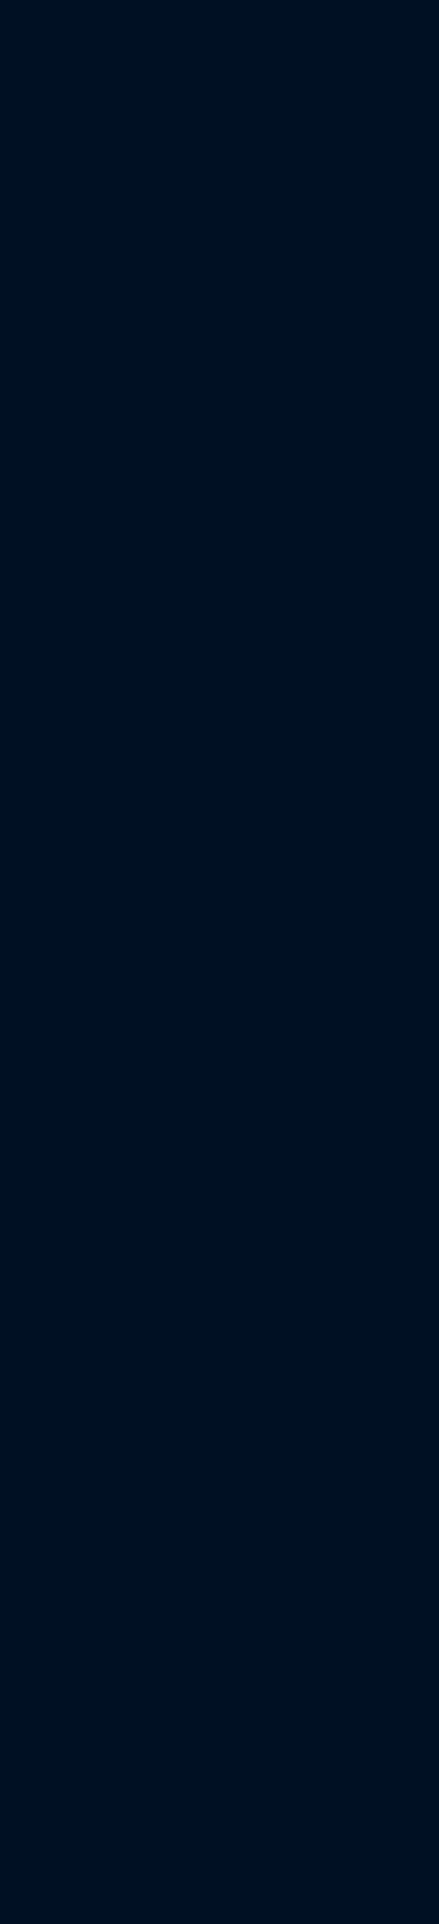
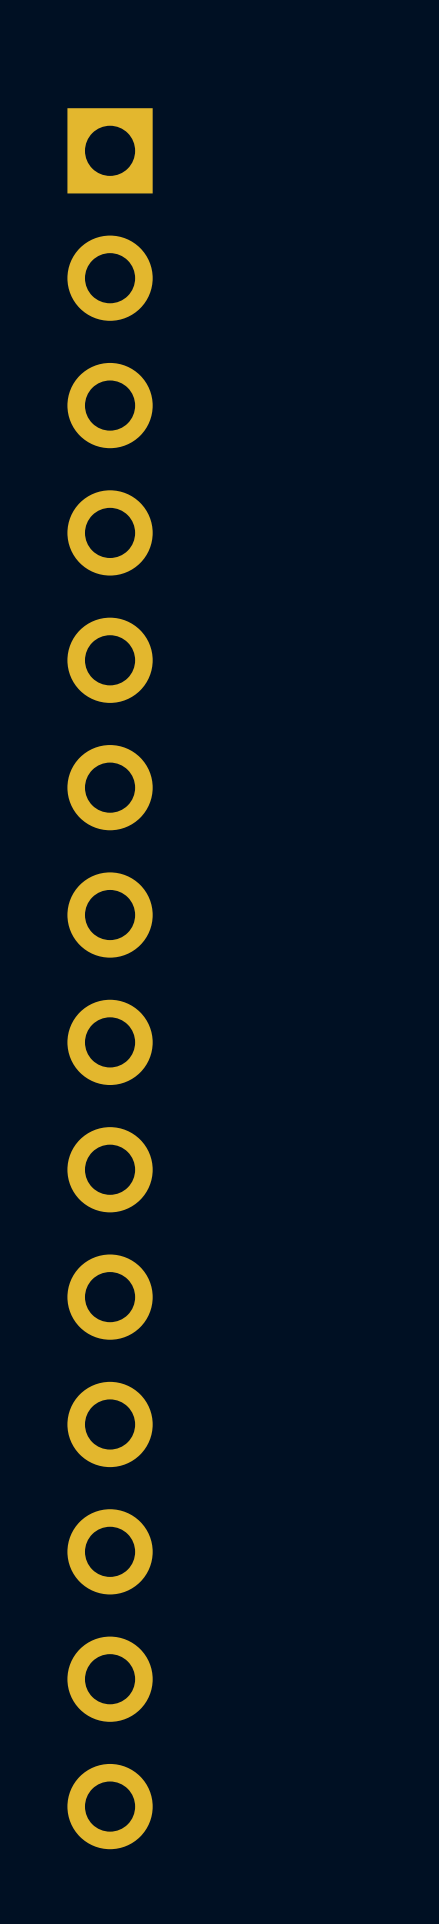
part: none -> (110, 978)

